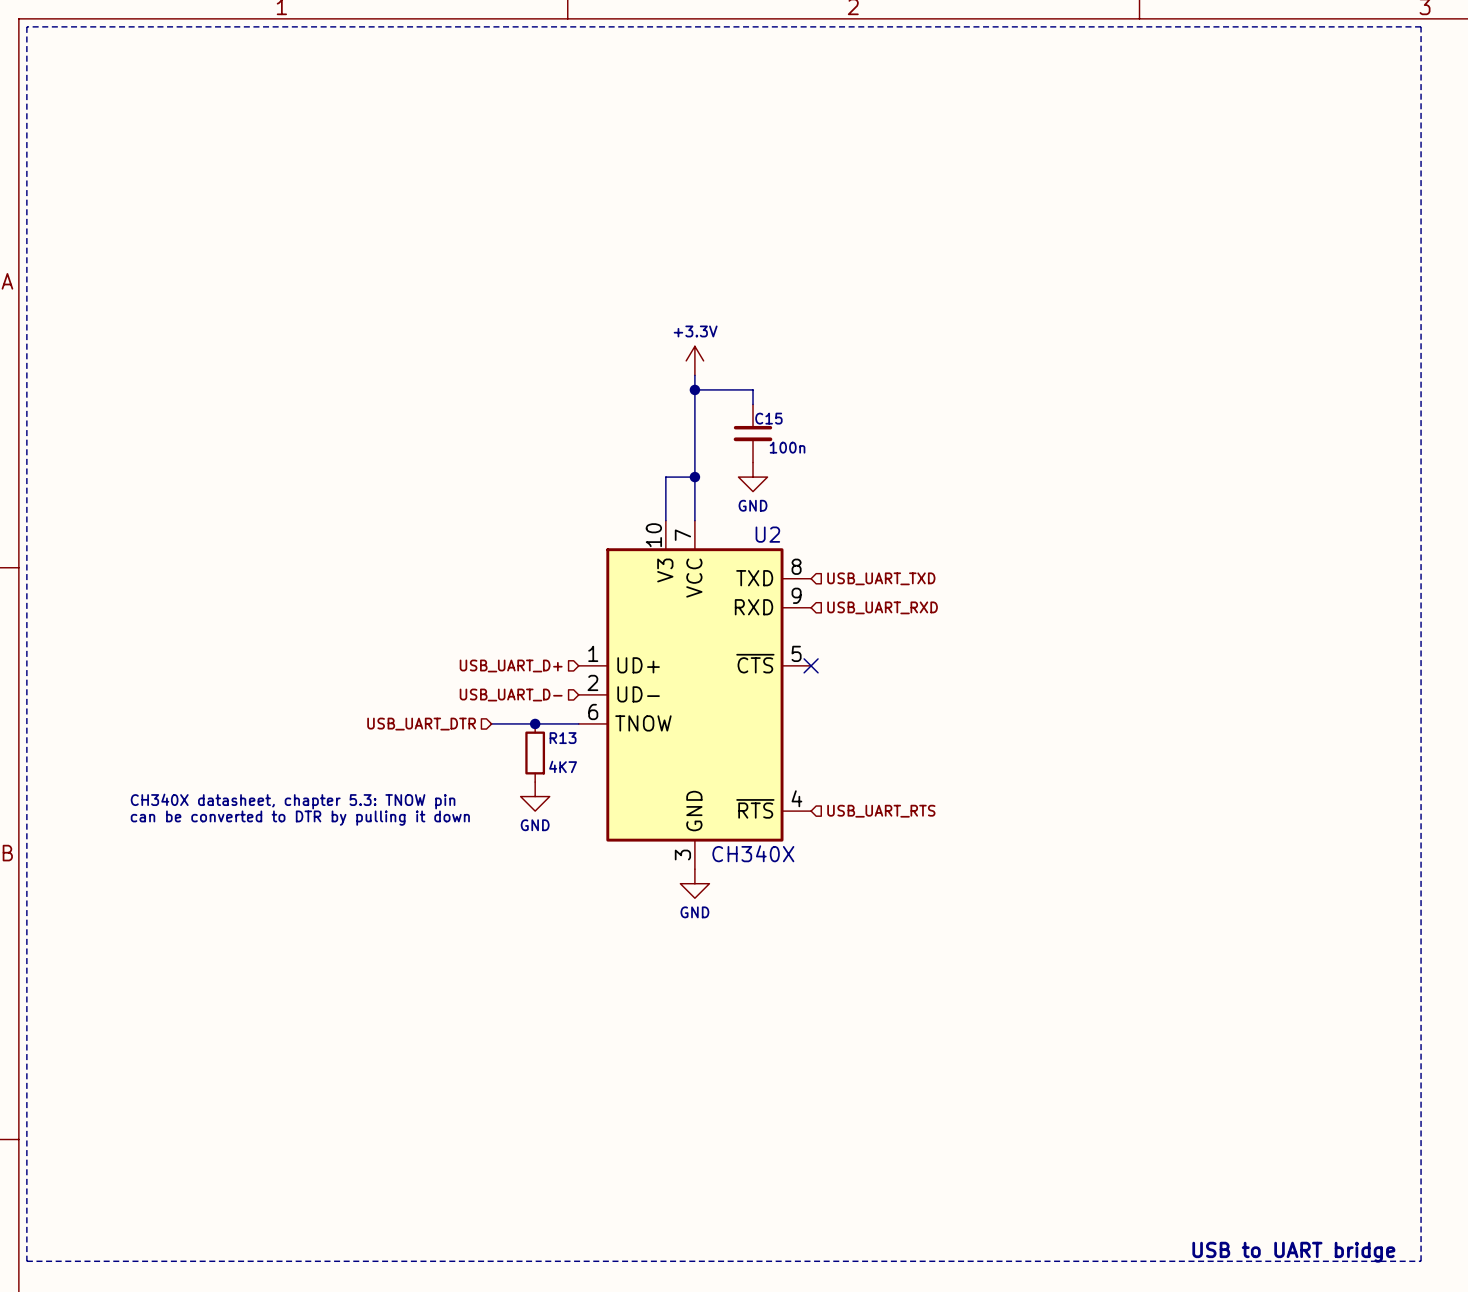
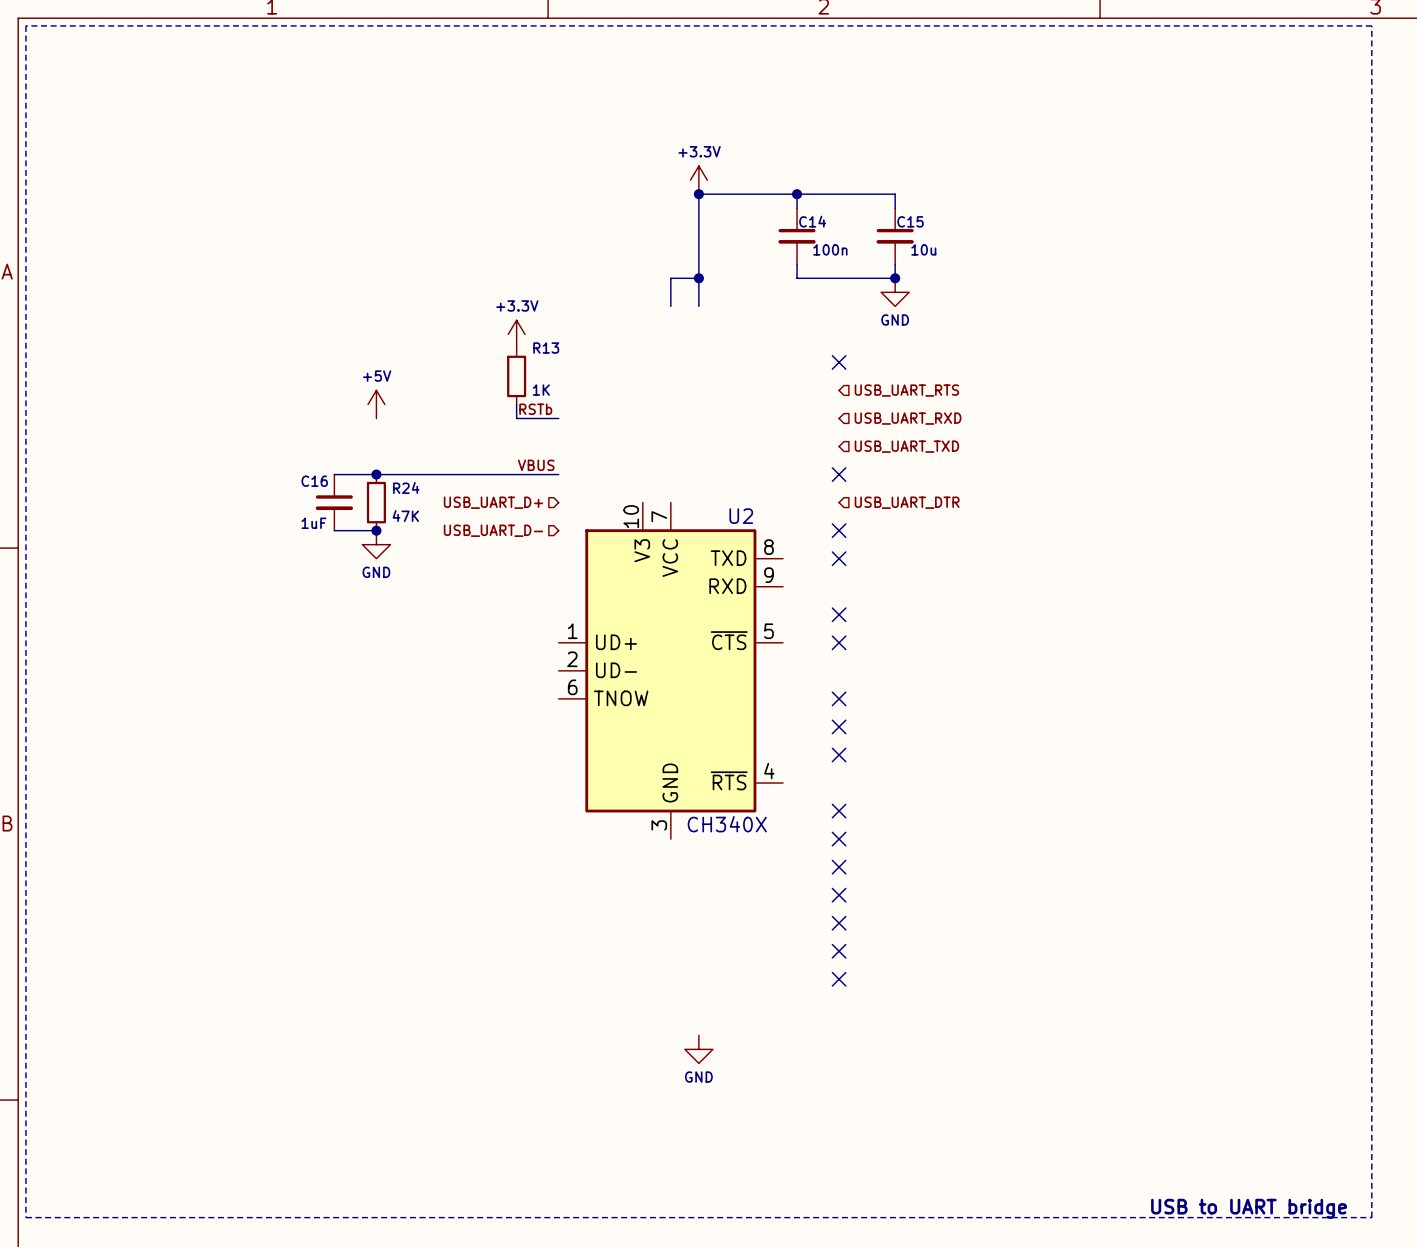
power symbol: none -> +3.3V (698, 180)
junction: none -> (698, 194)
wire: none -> (797, 194) (797, 208)
junction: none -> (797, 194)
wire: none -> (895, 208) (895, 194) (698, 194) (698, 306)
C14: none -> 100n (797, 236)
wire: none -> (797, 264) (797, 278) (895, 278) (895, 264)
wire: none -> (698, 278) (670, 278) (670, 306)
junction: none -> (698, 278)
junction: none -> (895, 278)
power symbol: none -> GND (895, 292)
power symbol: none -> +3.3V (516, 334)
power symbol: +3.3V (694, 360) -> none
wire: (694, 375) (694, 520) -> none
no-connect mark: none -> (839, 362)
wire: (694, 389) (753, 389) (753, 404) -> none
junction: (694, 389) -> none
hierarchical label: none -> USB_UART_RTS (906, 390)
power symbol: none -> +5V (376, 404)
wire: none -> (516, 404) (516, 418) (558, 418)
label: none -> RSTb (535, 409)
C15 position: (753, 433) -> (895, 236)
C15 value: 100n (787, 447) -> 10u (923, 249)
wire: (694, 477) (665, 477) (665, 520) -> none
junction: (694, 477) -> none
power symbol: GND (753, 477) -> none
label: none -> VBUS (536, 465)
wire: none -> (334, 474) (558, 474)
junction: none -> (376, 474)
no-connect mark: none -> (839, 474)
C16: none -> 1uF (334, 502)
R24: none -> 47K (376, 502)
hierarchical label: none -> USB_UART_DTR (907, 502)
wire: none -> (334, 530) (376, 530)
junction: none -> (376, 530)
no-connect mark: none -> (839, 530)
power symbol: none -> GND (376, 544)
no-connect mark: none -> (839, 558)
hierarchical label position: USB_UART_TXD (881, 578) -> USB_UART_TXD (906, 446)
hierarchical label position: USB_UART_RXD (882, 607) -> USB_UART_RXD (908, 418)
no-connect mark: none -> (839, 614)
hierarchical label position: USB_UART_D+ (511, 665) -> USB_UART_D+ (493, 502)
no-connect mark: (811, 665) -> none
no-connect mark: none -> (839, 642)
hierarchical label position: USB_UART_D- (511, 695) -> USB_UART_D- (493, 530)
wire: (491, 723) (578, 723) -> none
junction: (535, 723) -> none
no-connect mark: none -> (839, 698)
hierarchical label: USB_UART_DTR (421, 724) -> none
R13 name position: R13 (563, 738) -> R13 (546, 348)
R13 position: (535, 753) -> (516, 376)
no-connect mark: none -> (839, 726)
R13 value: 4K7 (563, 766) -> 1K (541, 390)
no-connect mark: none -> (839, 754)
power symbol: GND (535, 796) -> none
text: CH340X datasheet, chapter 5.3: TNOW pin (293, 801) -> none
hierarchical label: USB_UART_RTS (881, 811) -> none
text: can be converted to DTR by pulling it down (300, 818) -> none
no-connect mark: none -> (839, 811)
no-connect mark: none -> (839, 839)
power symbol: GND (694, 883) -> none
no-connect mark: none -> (839, 867)
no-connect mark: none -> (839, 895)
no-connect mark: none -> (839, 923)
no-connect mark: none -> (839, 951)
no-connect mark: none -> (839, 979)
power symbol: none -> GND (698, 1049)

